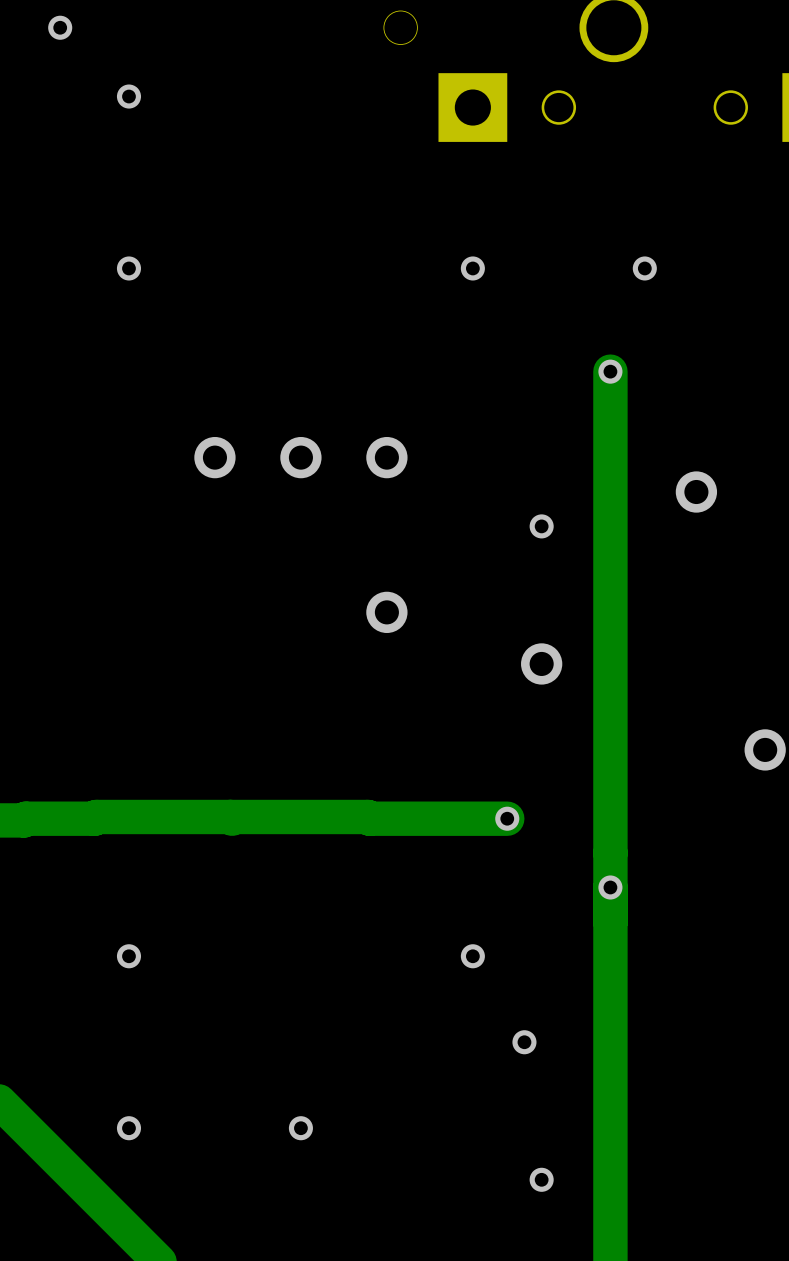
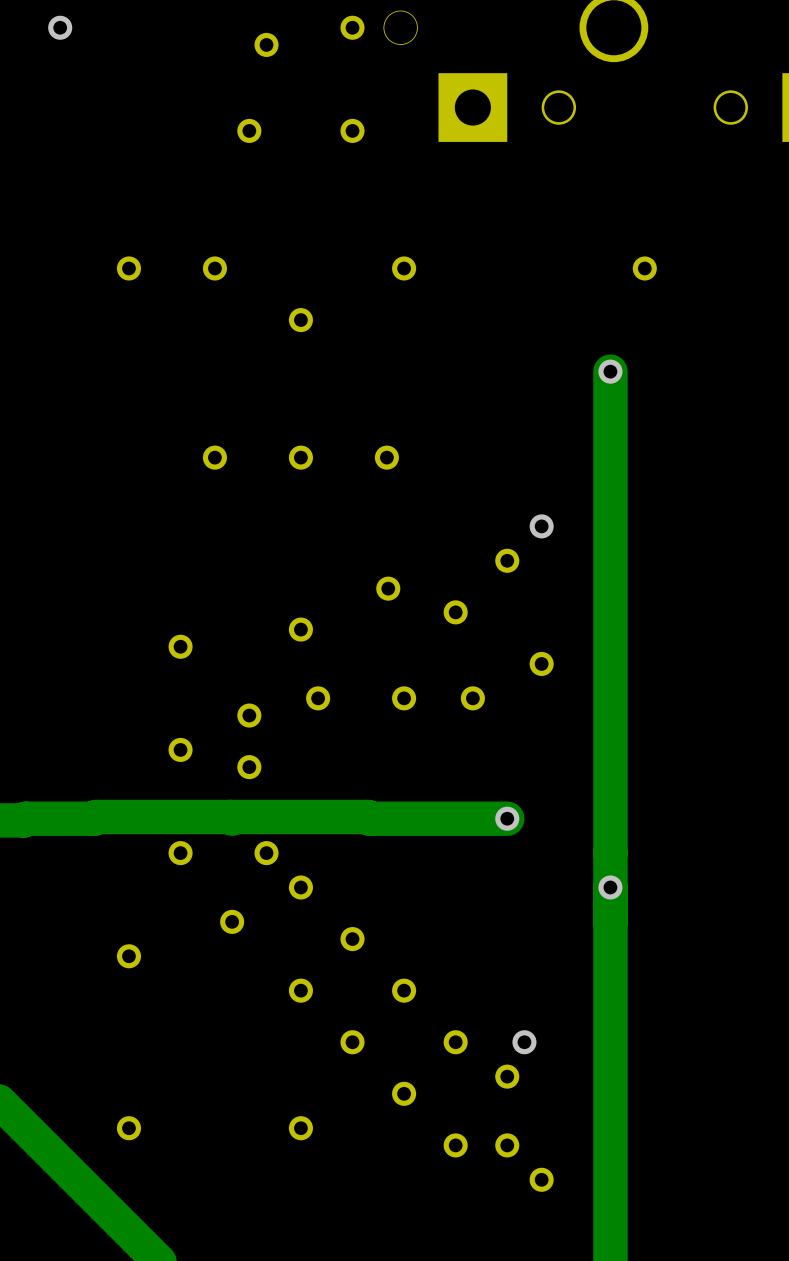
part: none -> (352, 27)
part: none -> (266, 44)
via: (128, 96) -> none
part: none -> (249, 130)
part: none -> (352, 130)
via: (128, 268) -> none
part: none -> (128, 268)
part: none -> (214, 268)
part: none -> (404, 268)
via: (472, 268) -> none
via: (644, 268) -> none
part: none -> (644, 268)
part: none -> (300, 320)
via: (214, 457) -> none
part: none -> (214, 457)
via: (300, 457) -> none
part: none -> (300, 457)
via: (386, 457) -> none
part: none -> (386, 457)
via: (696, 492) -> none
part: none -> (507, 560)
part: none -> (388, 588)
via: (386, 612) -> none
part: none -> (455, 612)
part: none -> (300, 629)
part: none -> (180, 646)
via: (541, 663) -> none
part: none -> (541, 663)
part: none -> (318, 698)
part: none -> (404, 698)
part: none -> (472, 698)
part: none -> (249, 715)
part: none -> (180, 749)
via: (765, 749) -> none
part: none -> (249, 767)
part: none -> (180, 853)
part: none -> (266, 853)
part: none -> (300, 887)
part: none -> (232, 921)
part: none -> (352, 939)
via: (128, 956) -> none
part: none -> (128, 956)
via: (472, 956) -> none
part: none -> (300, 990)
part: none -> (404, 990)
part: none -> (352, 1042)
part: none -> (455, 1042)
part: none -> (507, 1076)
part: none -> (404, 1093)
via: (128, 1128) -> none
part: none -> (128, 1128)
via: (300, 1128) -> none
part: none -> (300, 1128)
part: none -> (455, 1145)
part: none -> (507, 1145)
via: (541, 1179) -> none
part: none -> (541, 1179)

